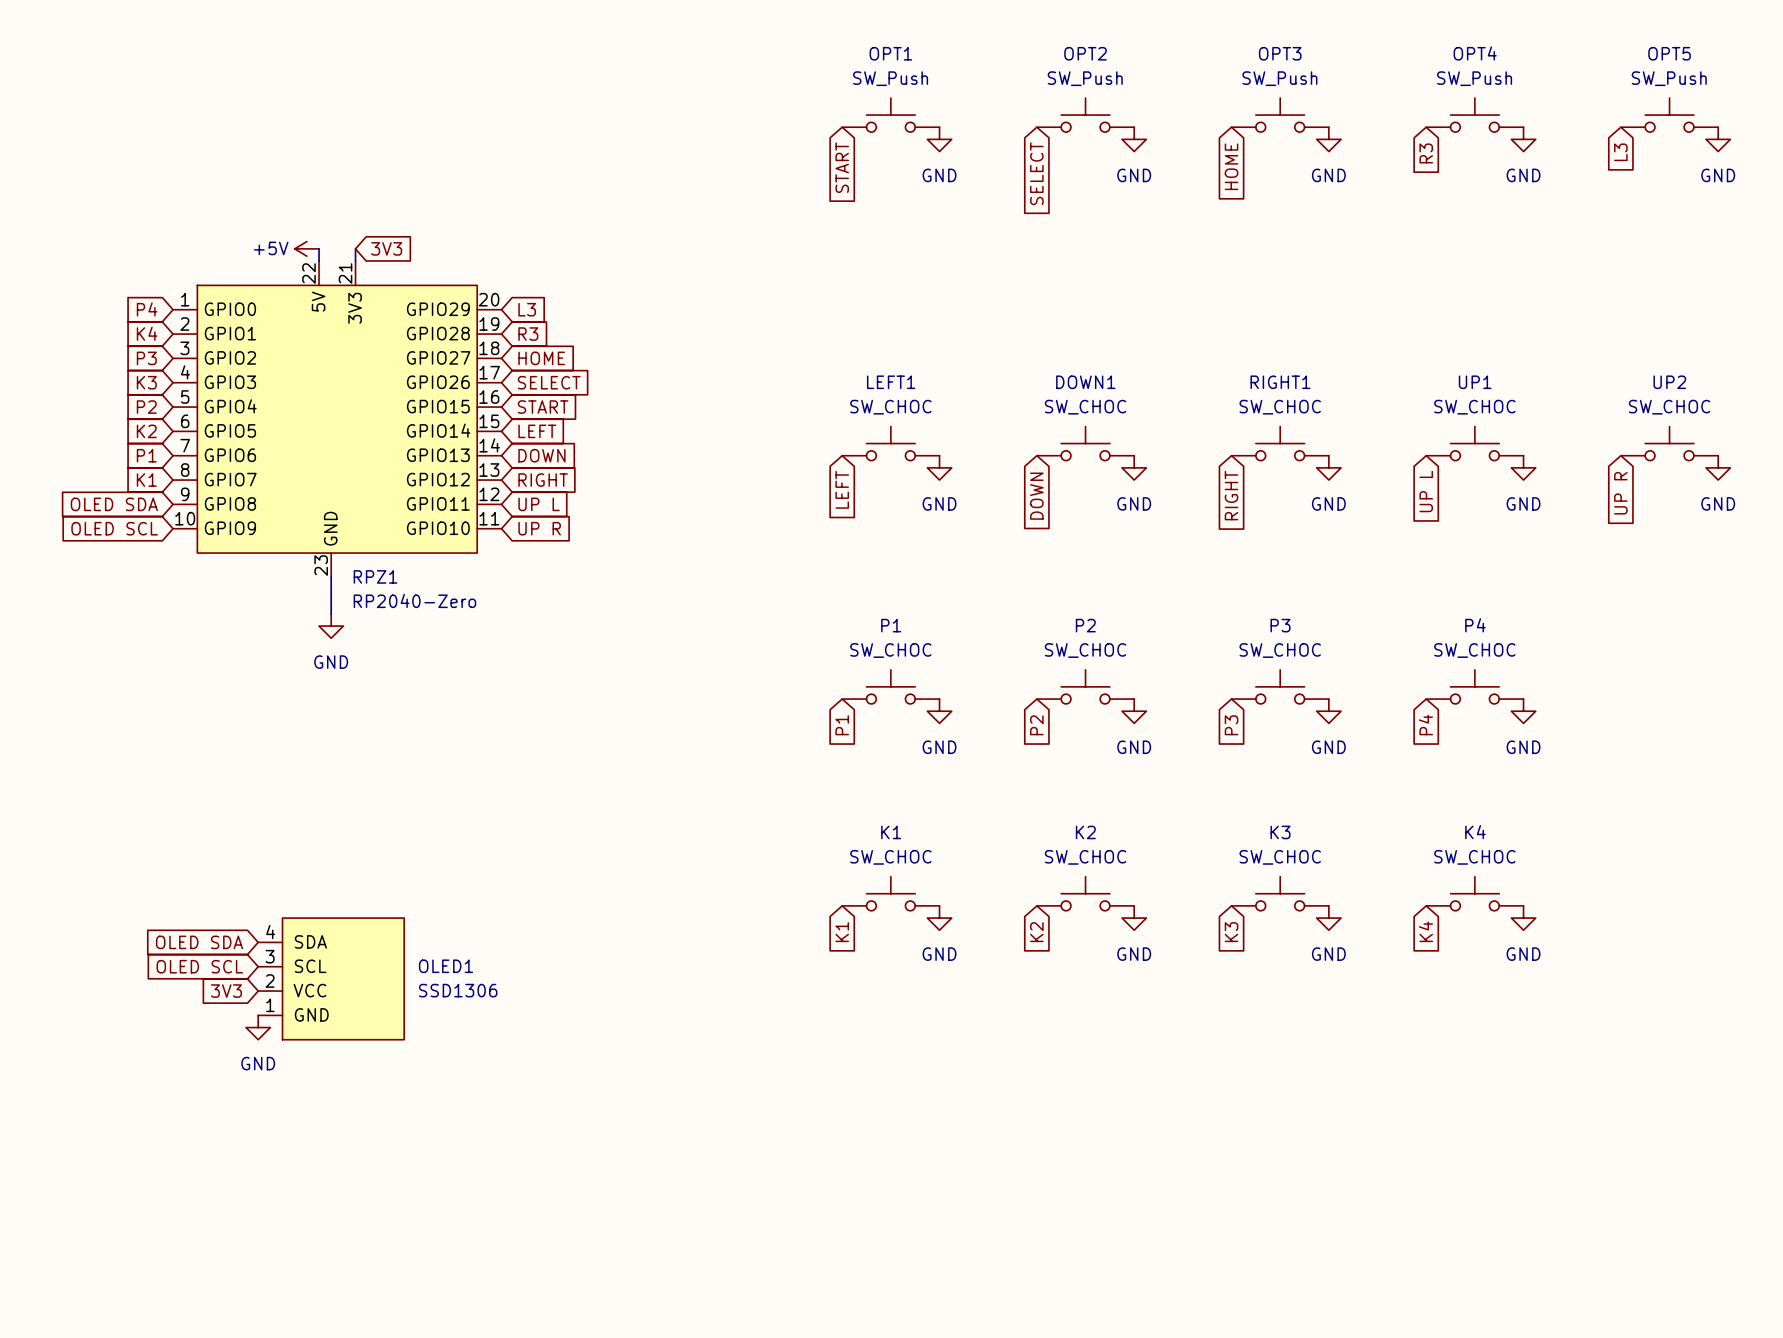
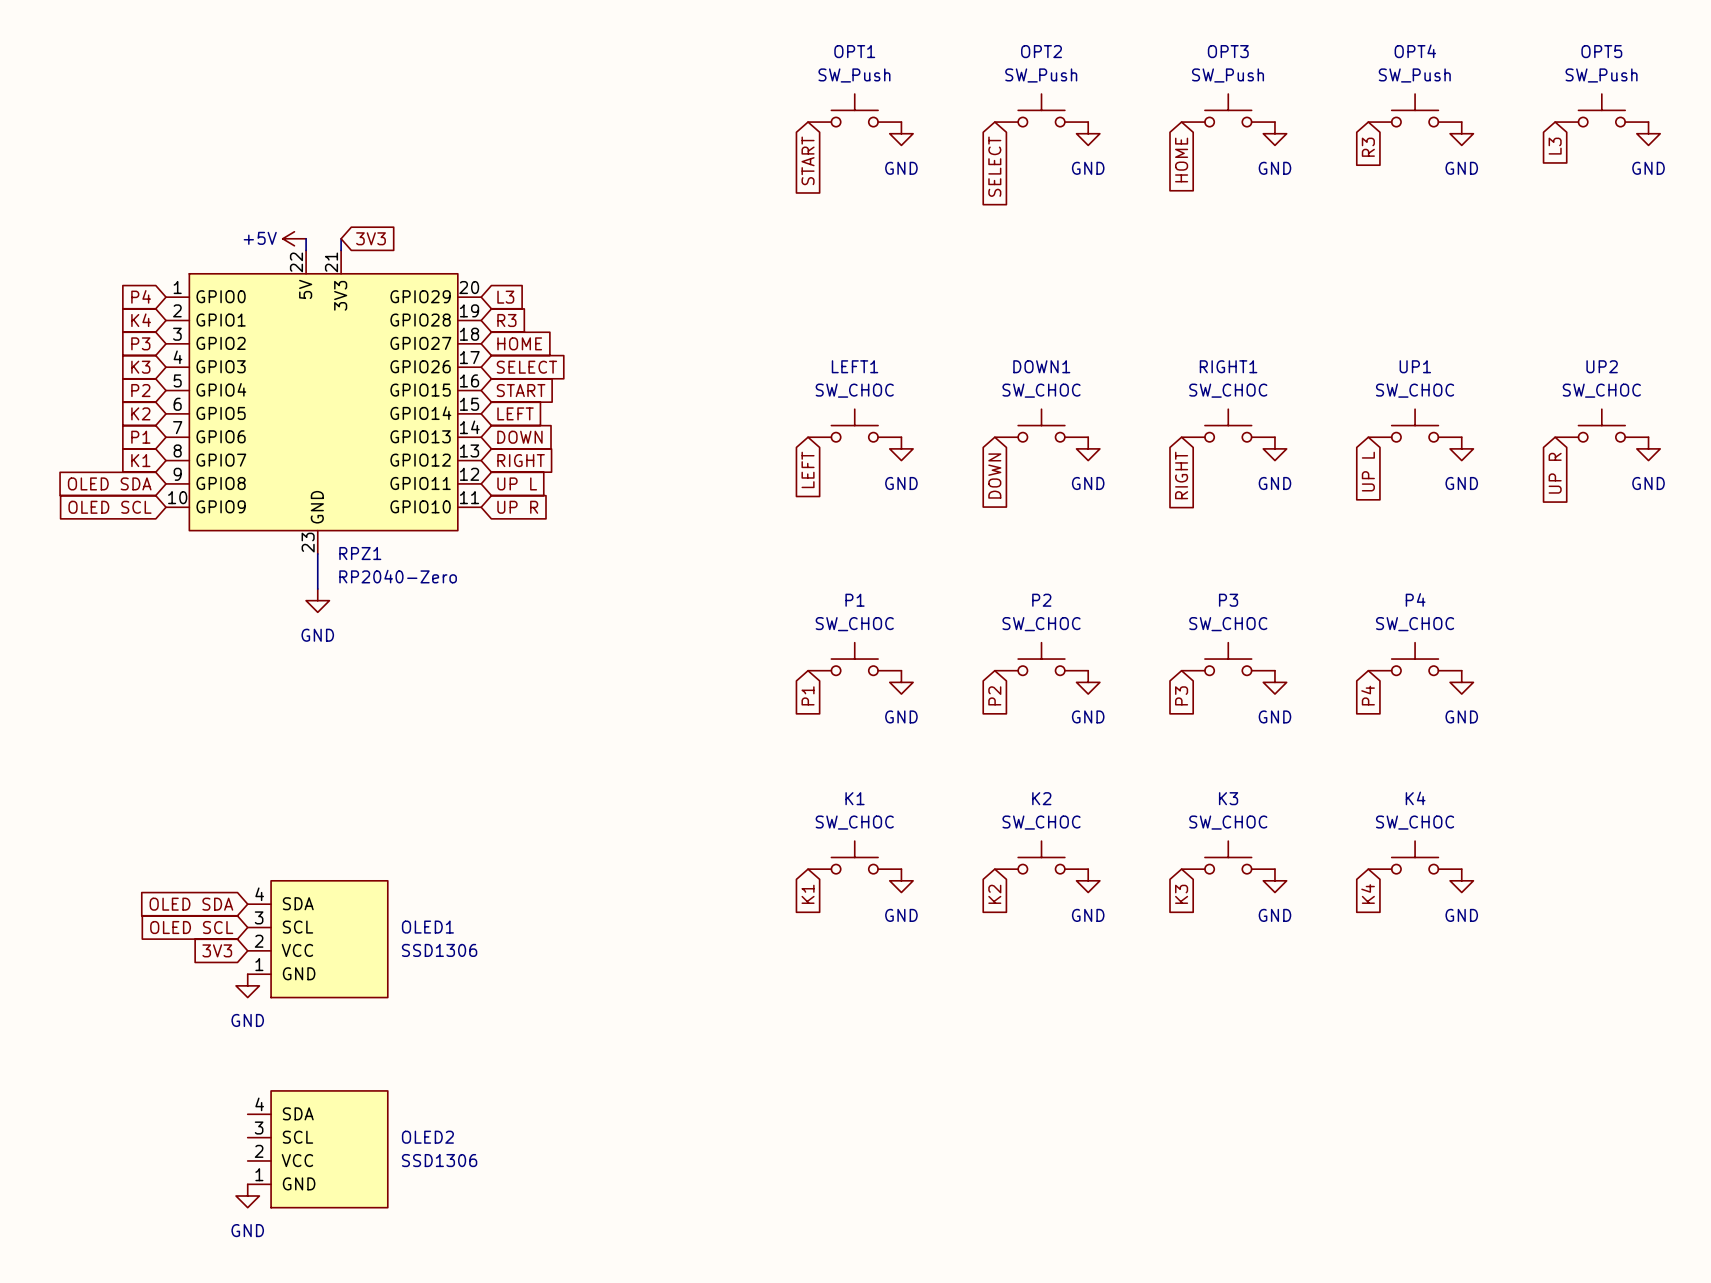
OLED2: none -> SSD1306 (317, 1149)
power symbol: none -> GND (247, 1196)

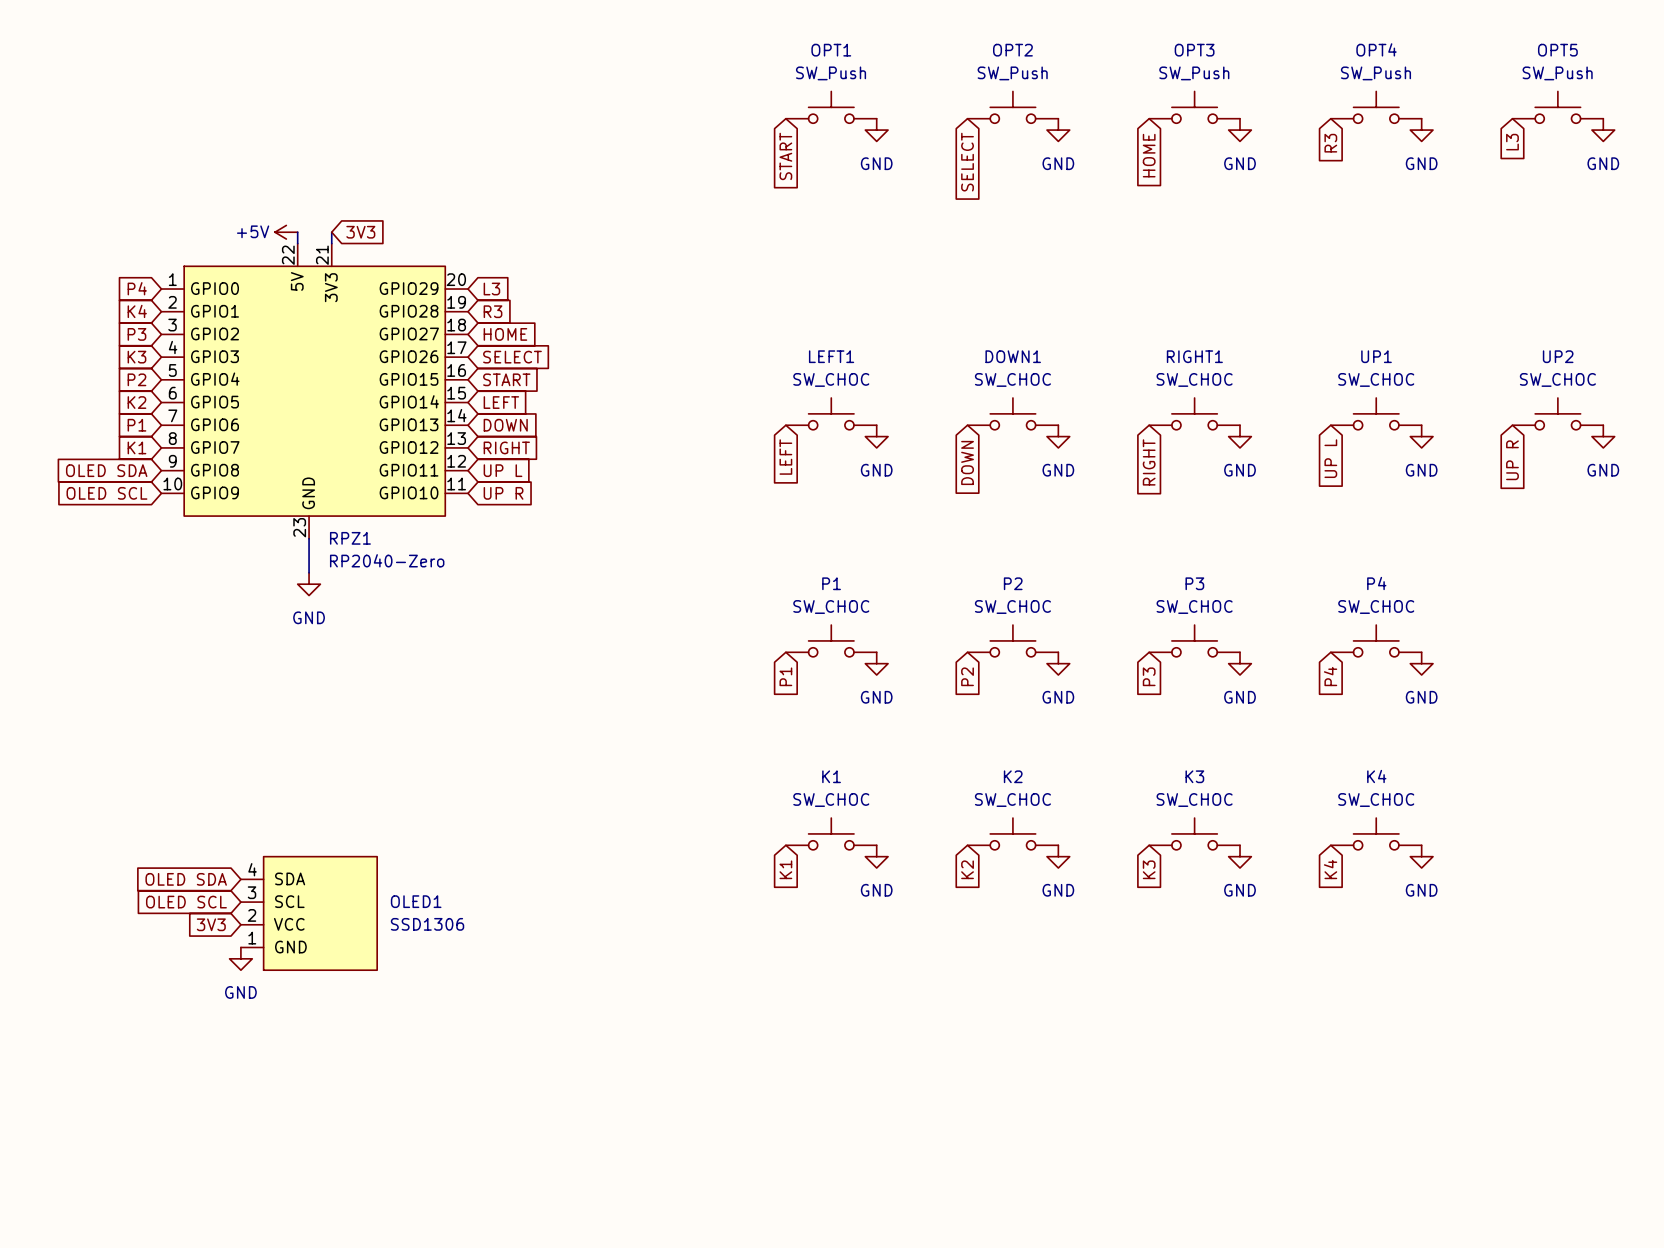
OLED2: SSD1306 (317, 1149) -> none
power symbol: GND (247, 1196) -> none

